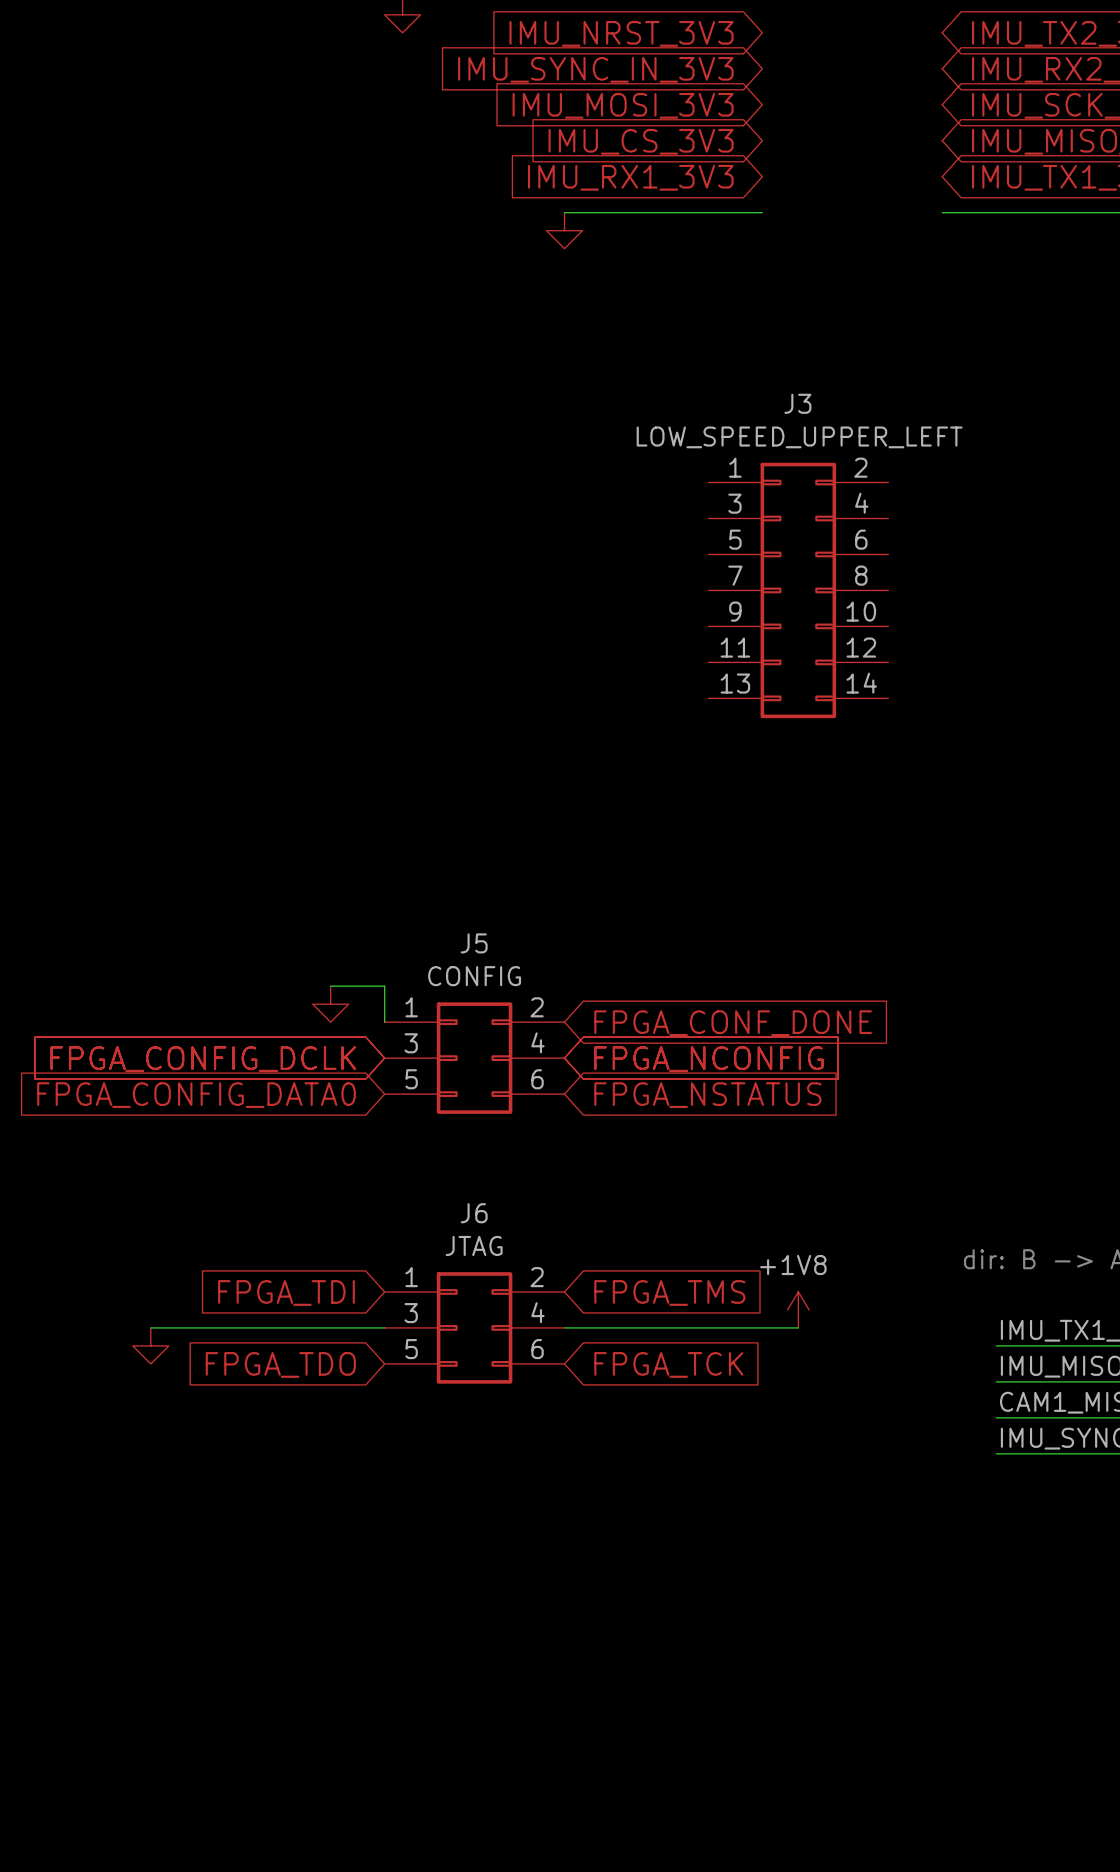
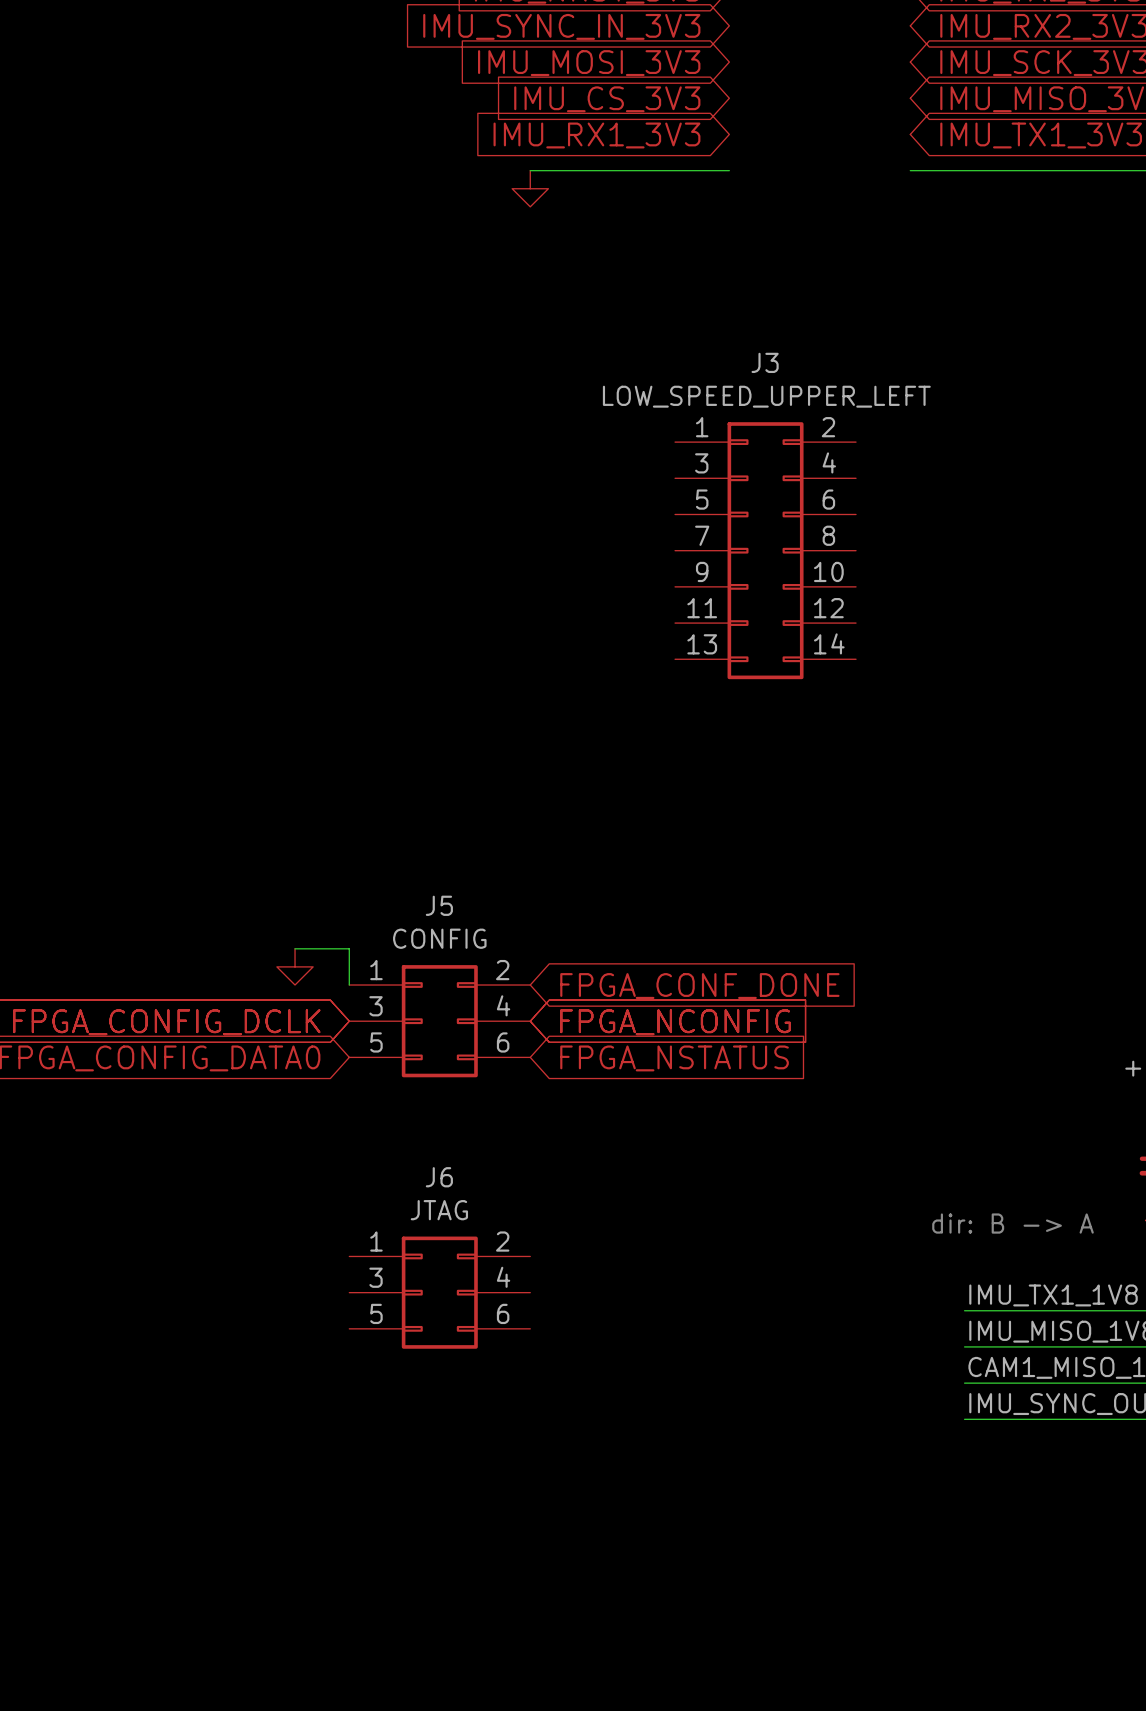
global label: FPGA_TDI (286, 1292) -> none
global label: FPGA_TMS (669, 1292) -> none
power symbol: +1V8 (798, 1309) -> none
wire: (150, 1327) (384, 1327) -> none
wire: (564, 1327) (798, 1327) -> none
power symbol: (150, 1345) -> none
global label: FPGA_TDO (280, 1364) -> none
global label: FPGA_TCK (668, 1364) -> none

